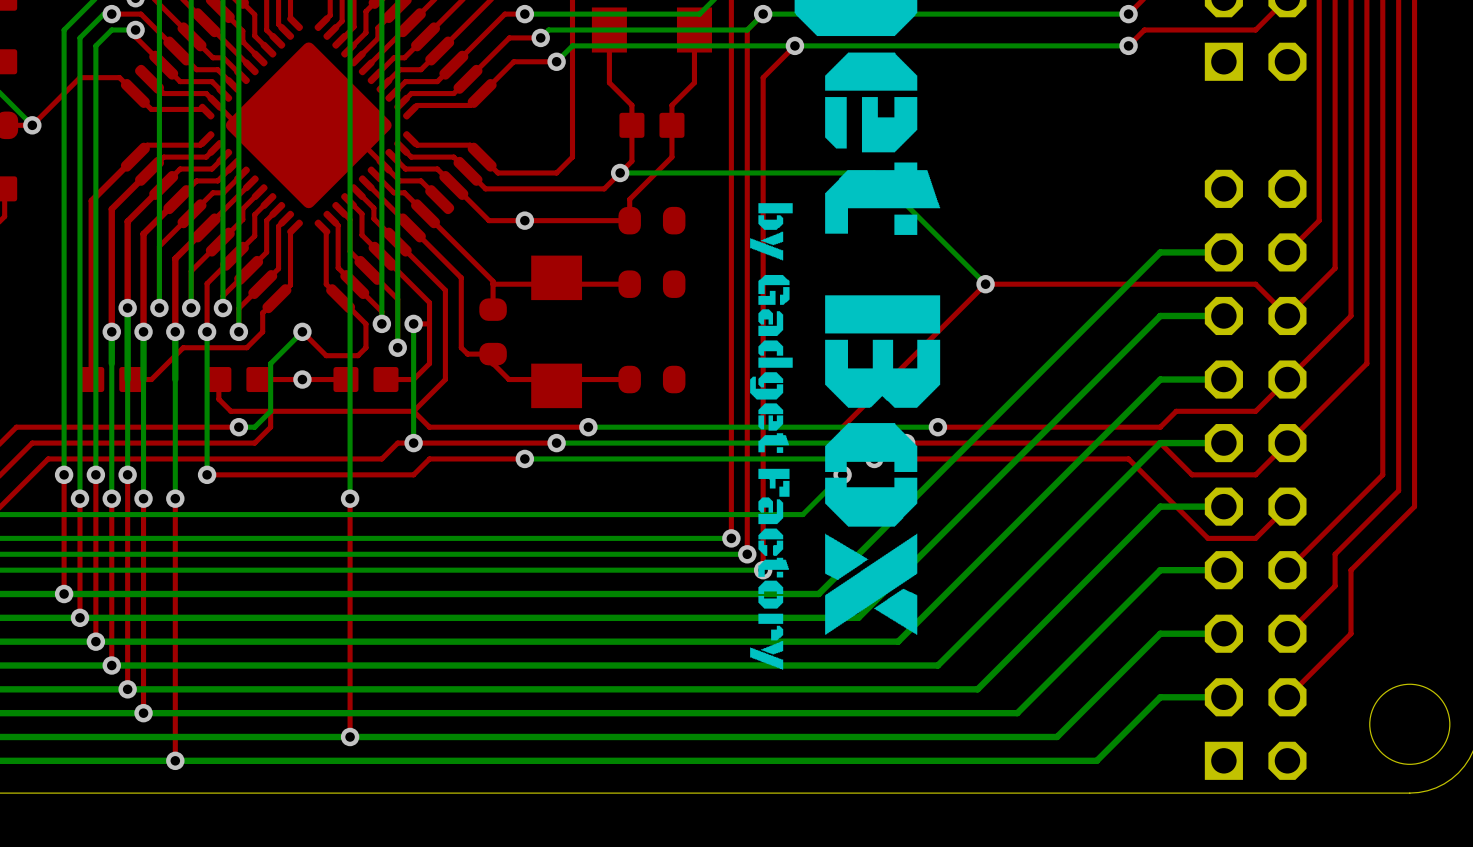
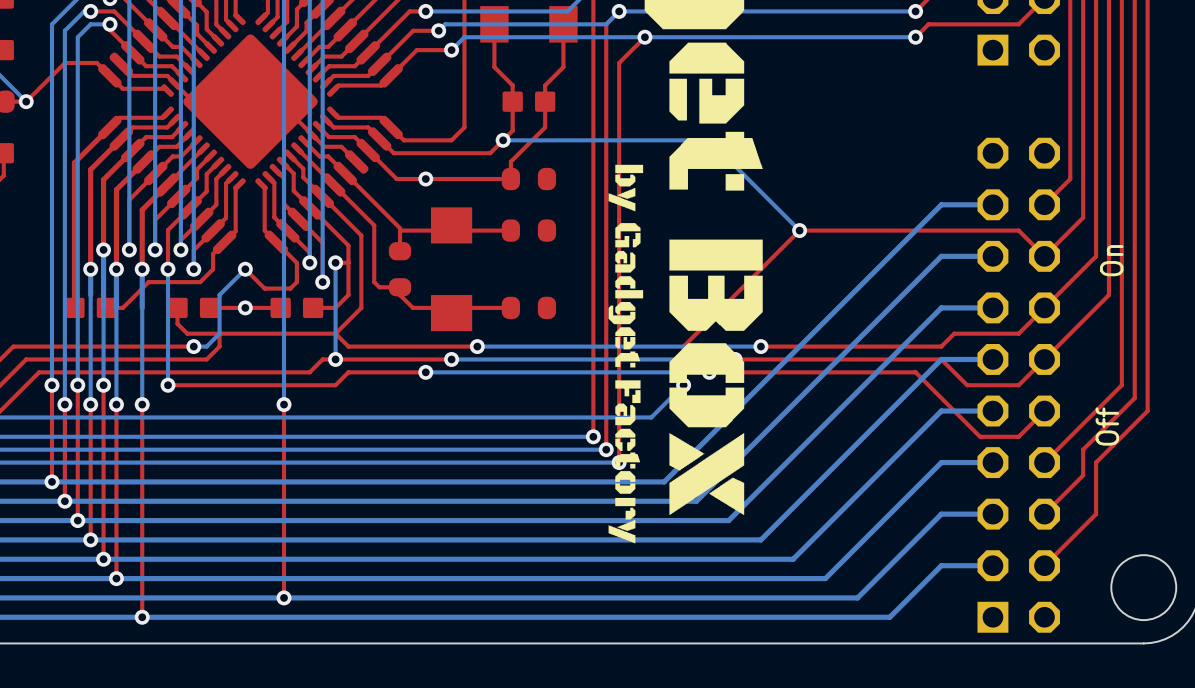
text: none -> On (1111, 260)
text: none -> Off (1107, 426)

